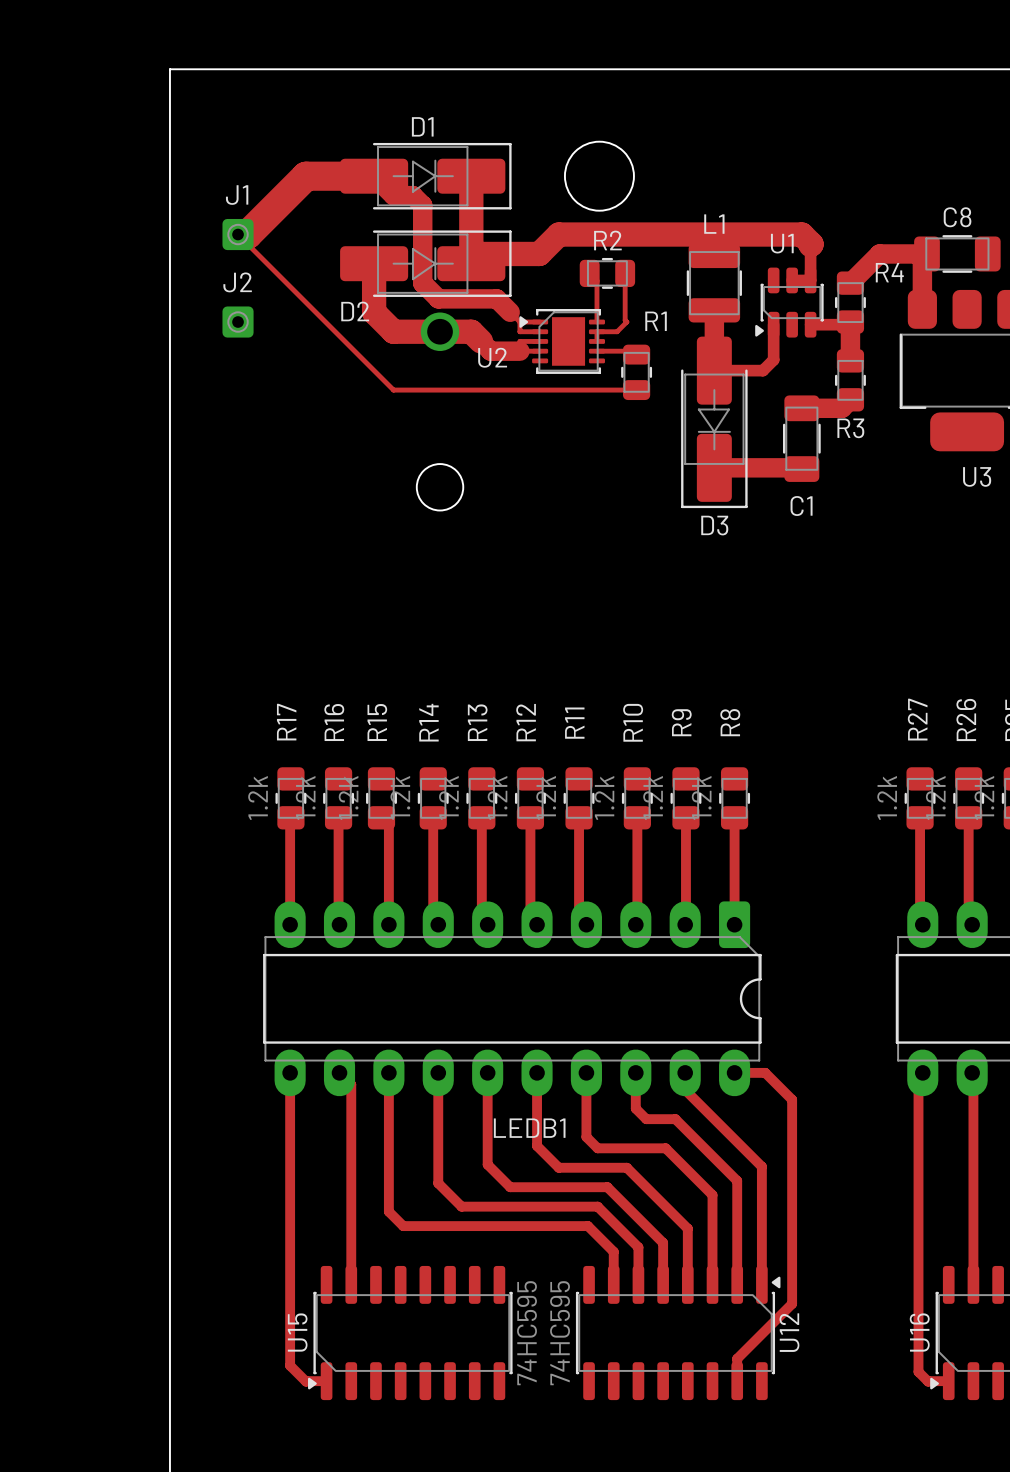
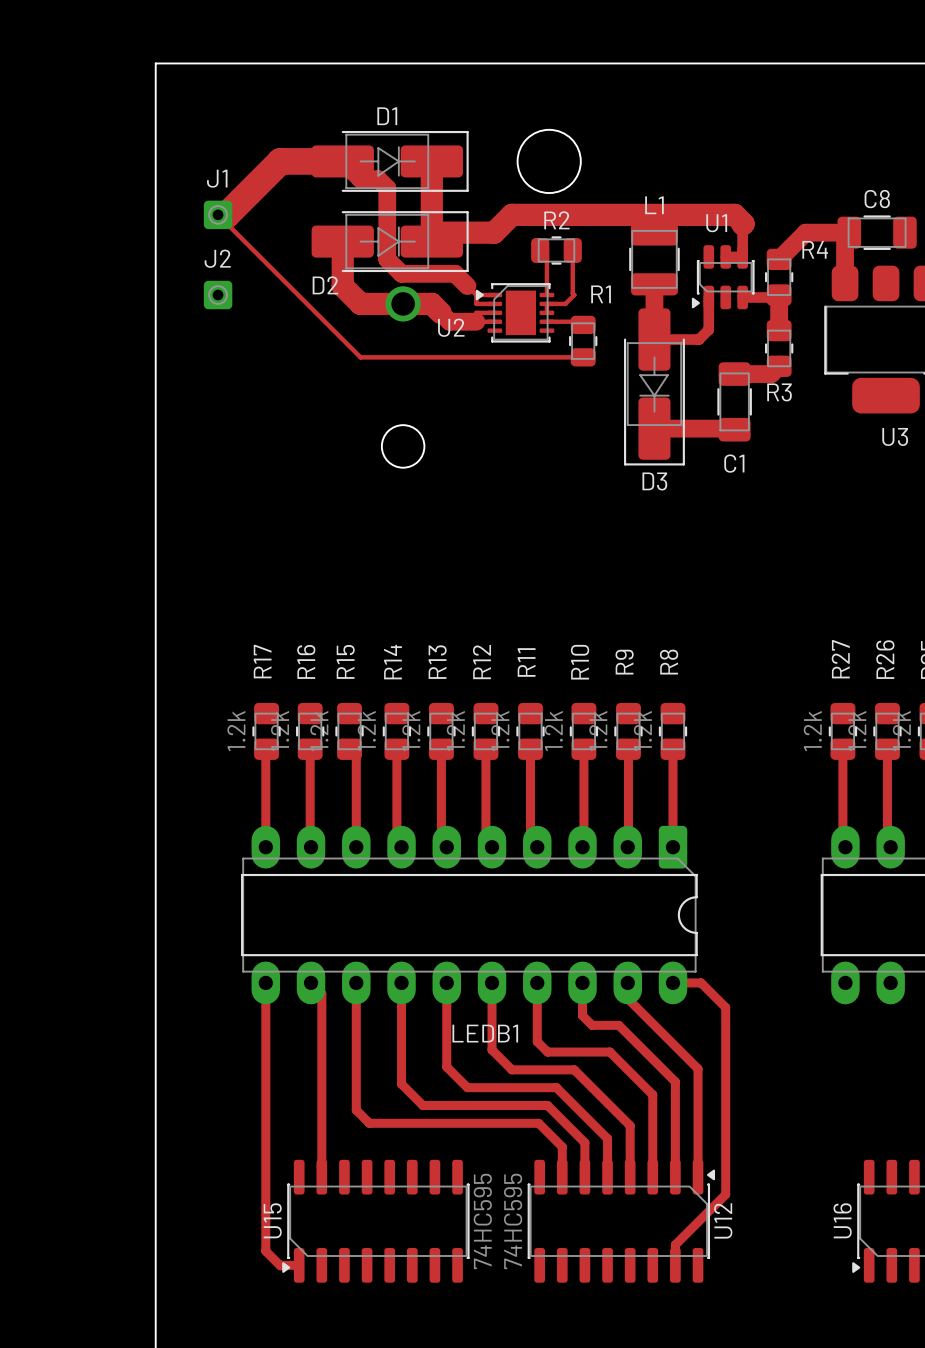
top track: (922, 1072) (918, 1077) (918, 1371) (928, 1381) (948, 1381) -> none
top track: (972, 1072) (973, 1284) -> none

